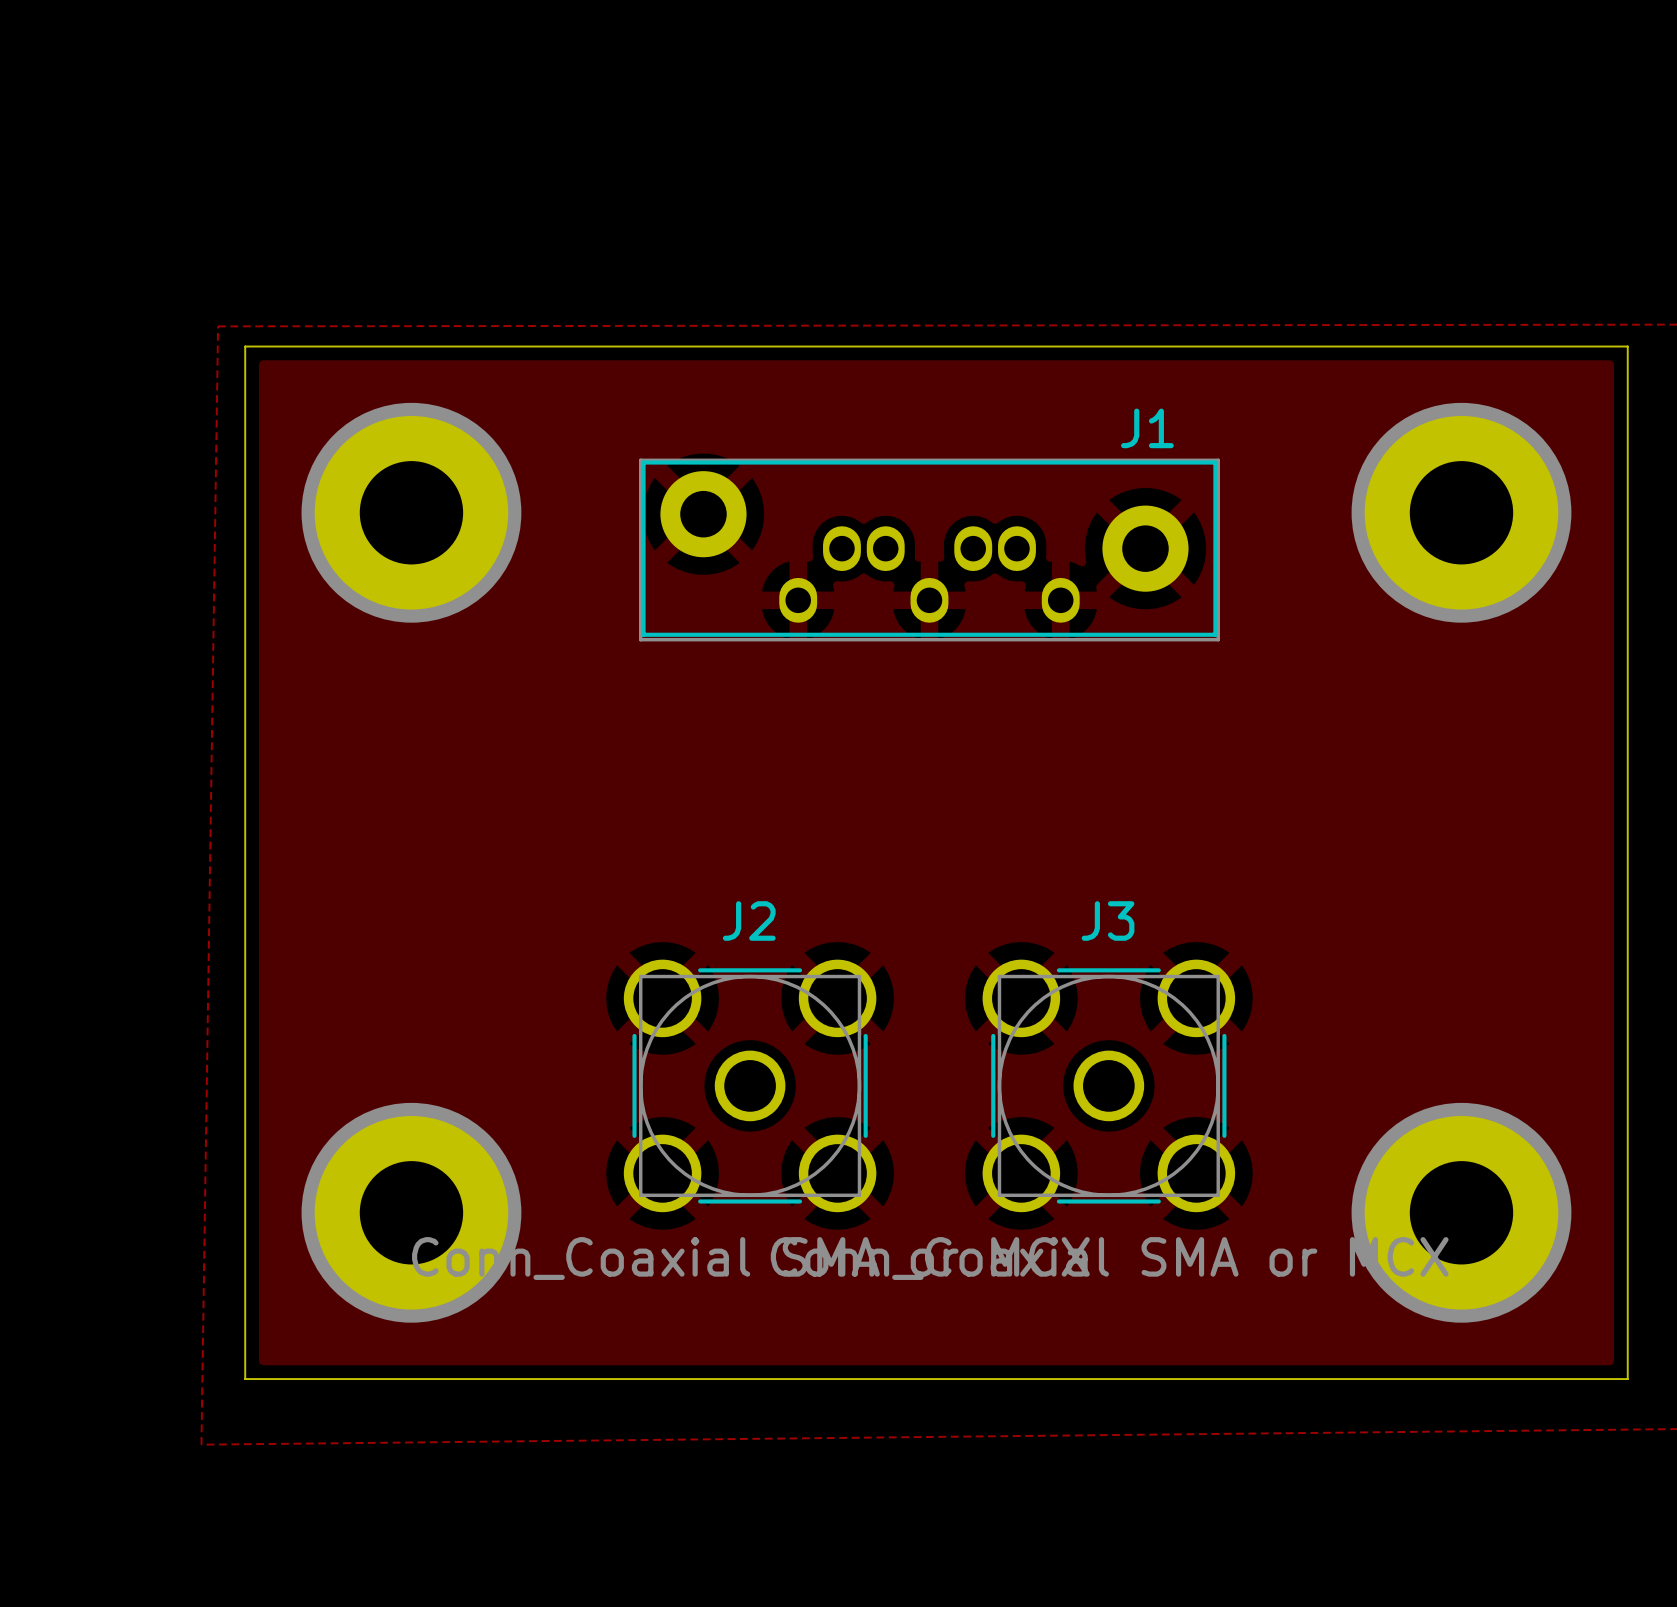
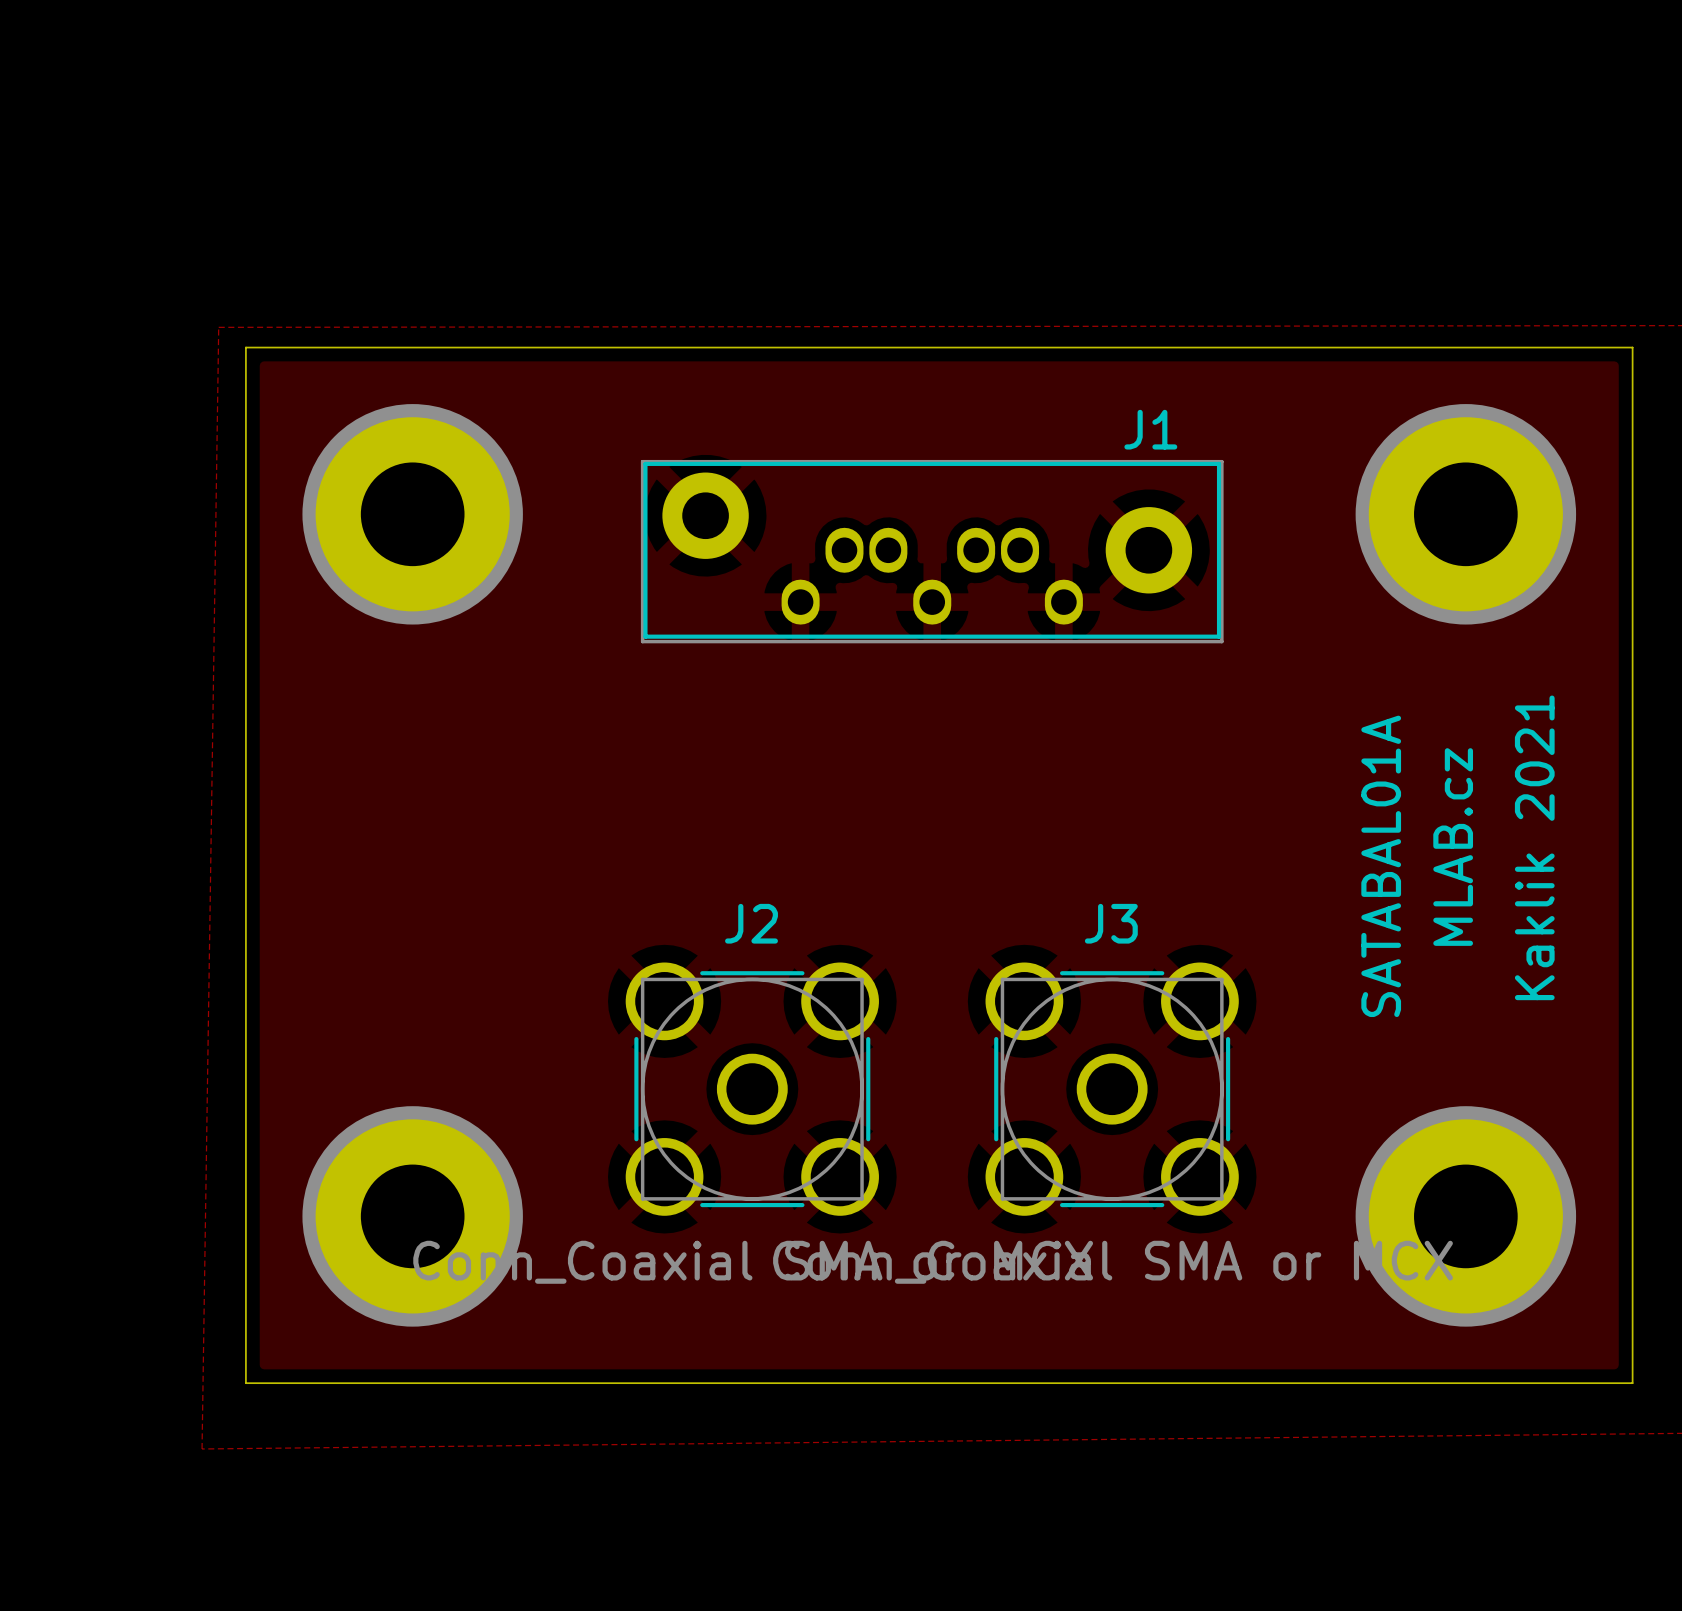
text: none -> MLAB.cz (1453, 847)
text: none -> Kaklik 2021 (1534, 847)
text: none -> SATABAL01A (1381, 866)

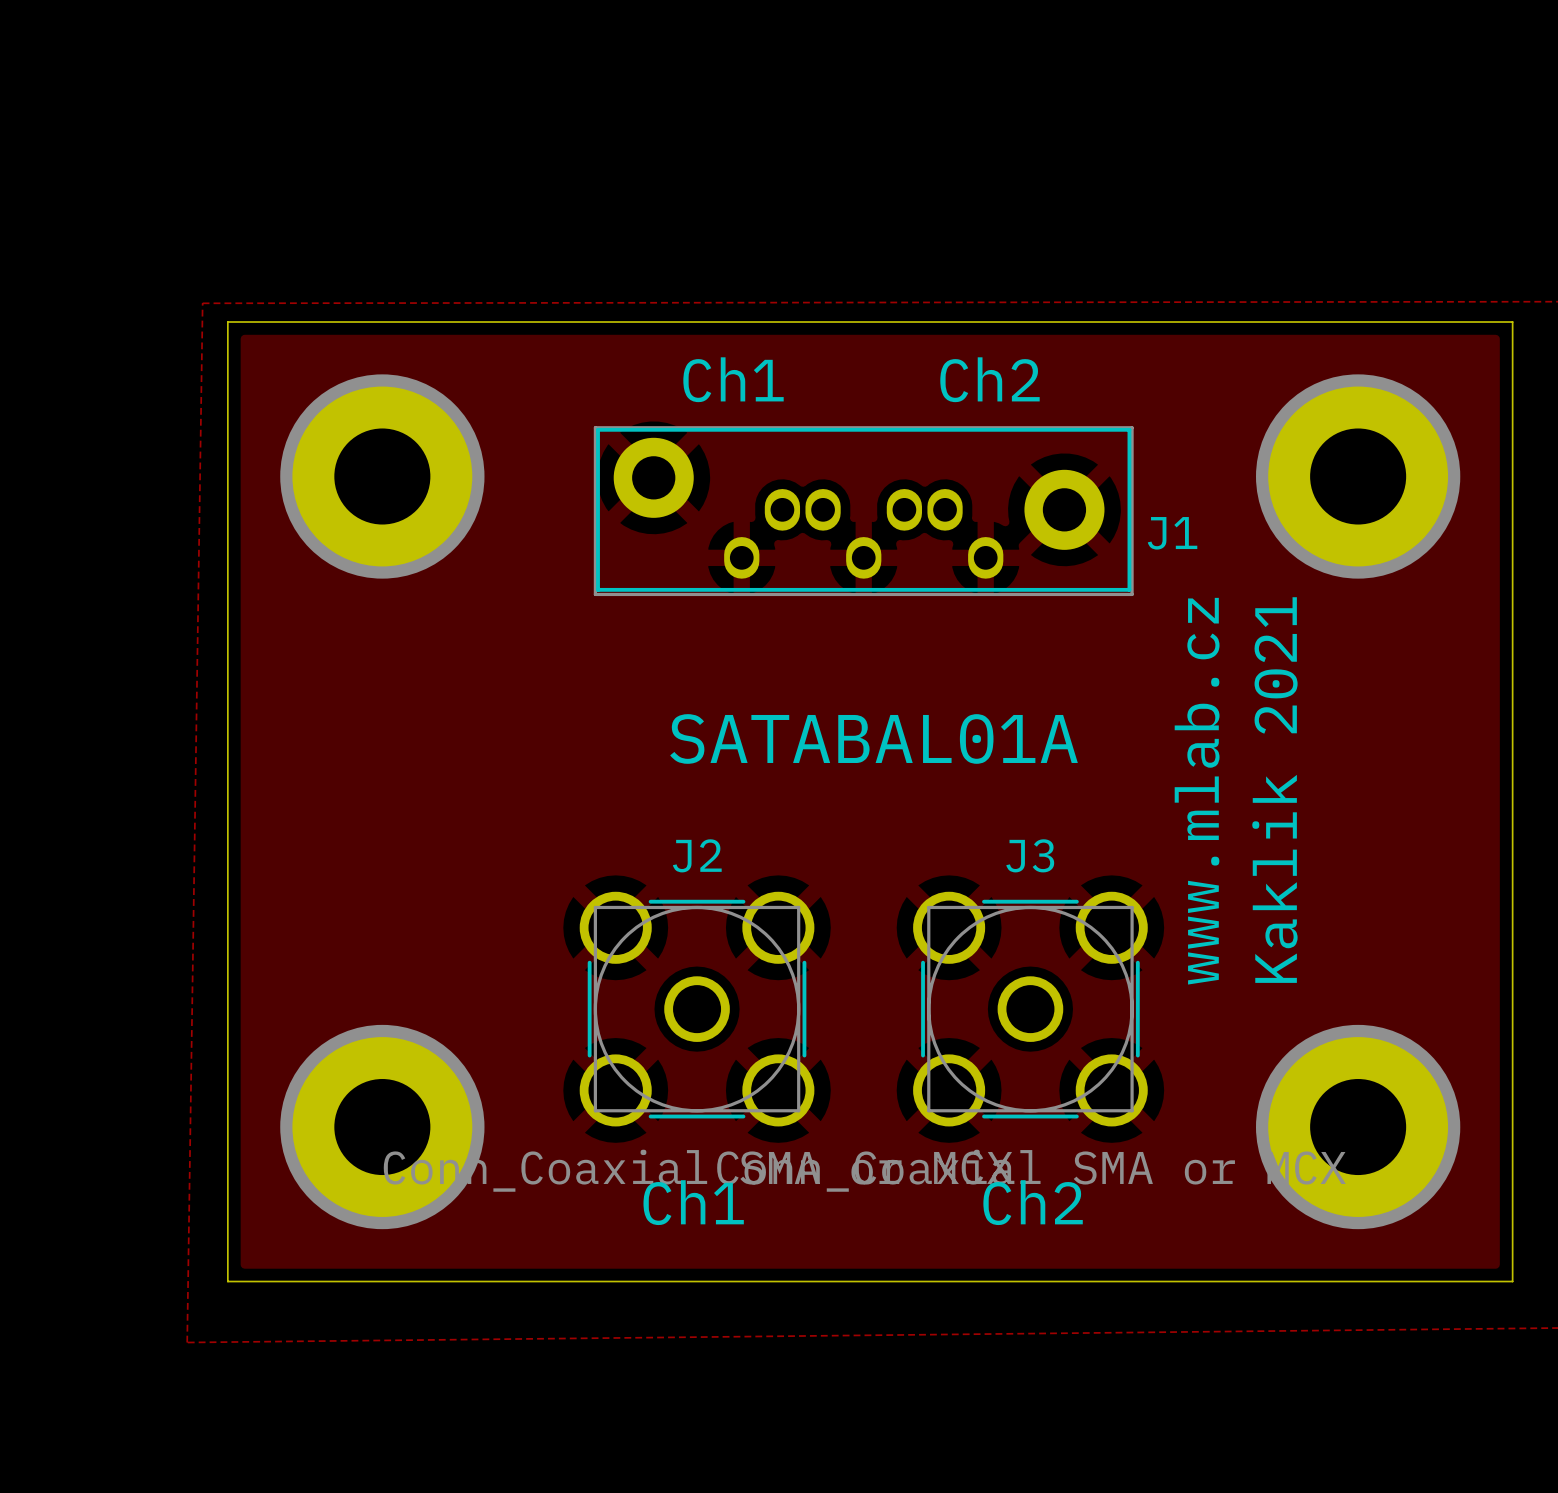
text: none -> Ch1 (733, 379)
text: none -> Ch2 (989, 379)
J1 name position: J1 (1150, 429) -> J1 (1172, 533)
text: none -> SATABAL01A (874, 738)
text: MLAB.cz (1453, 847) -> none
text: Kaklik 2021 (1534, 847) -> none
text: none -> www.mlab.cz (1197, 791)
text: SATABAL01A (1381, 866) -> Kaklik 2021 (1274, 790)
text: none -> Ch1 (693, 1202)
text: none -> Ch2 (1033, 1202)

